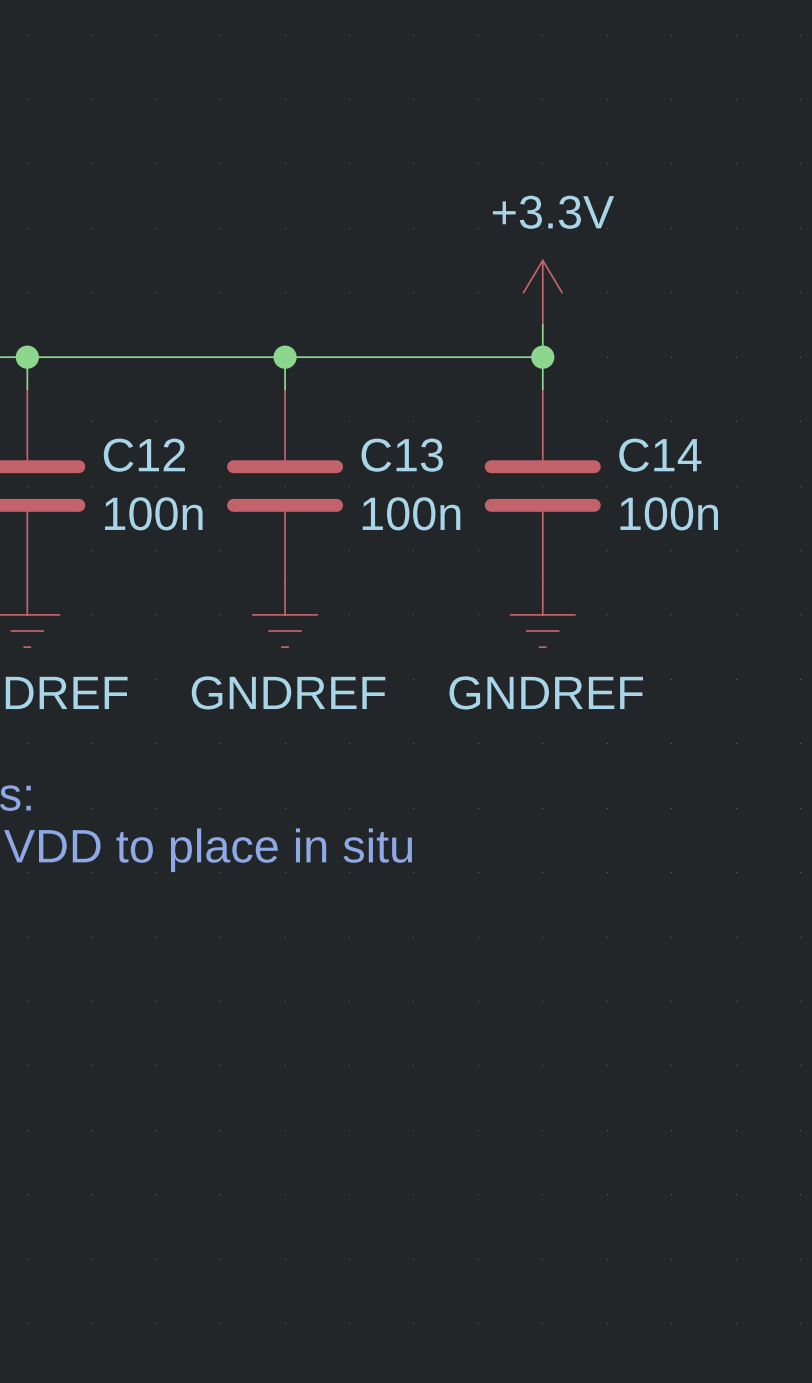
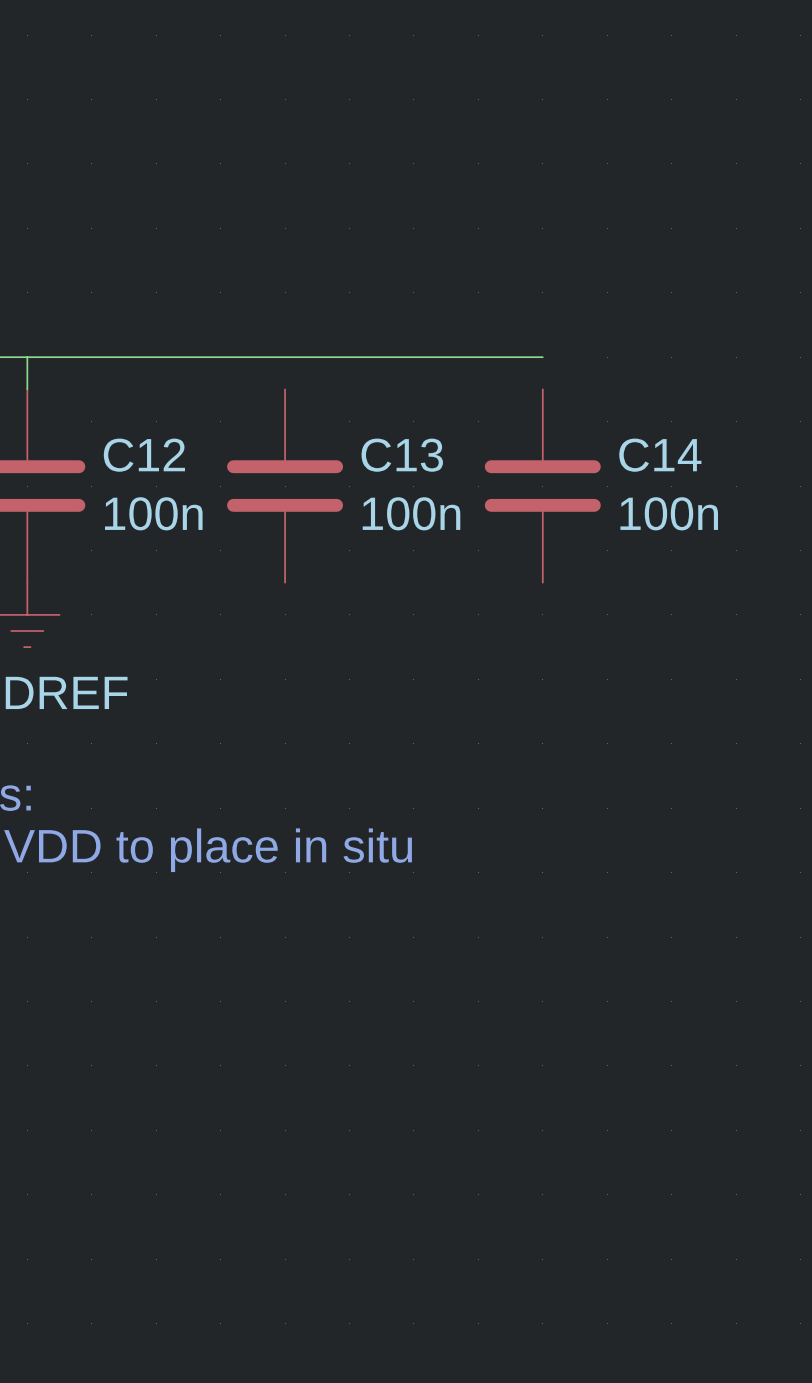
power symbol: +3.3V (542, 292) -> none
wire: (542, 324) (542, 389) -> none
junction: (27, 357) -> none
wire: (285, 357) (285, 389) -> none
junction: (285, 357) -> none
junction: (542, 357) -> none
power symbol: GNDREF (285, 614) -> none
power symbol: GNDREF (542, 614) -> none

